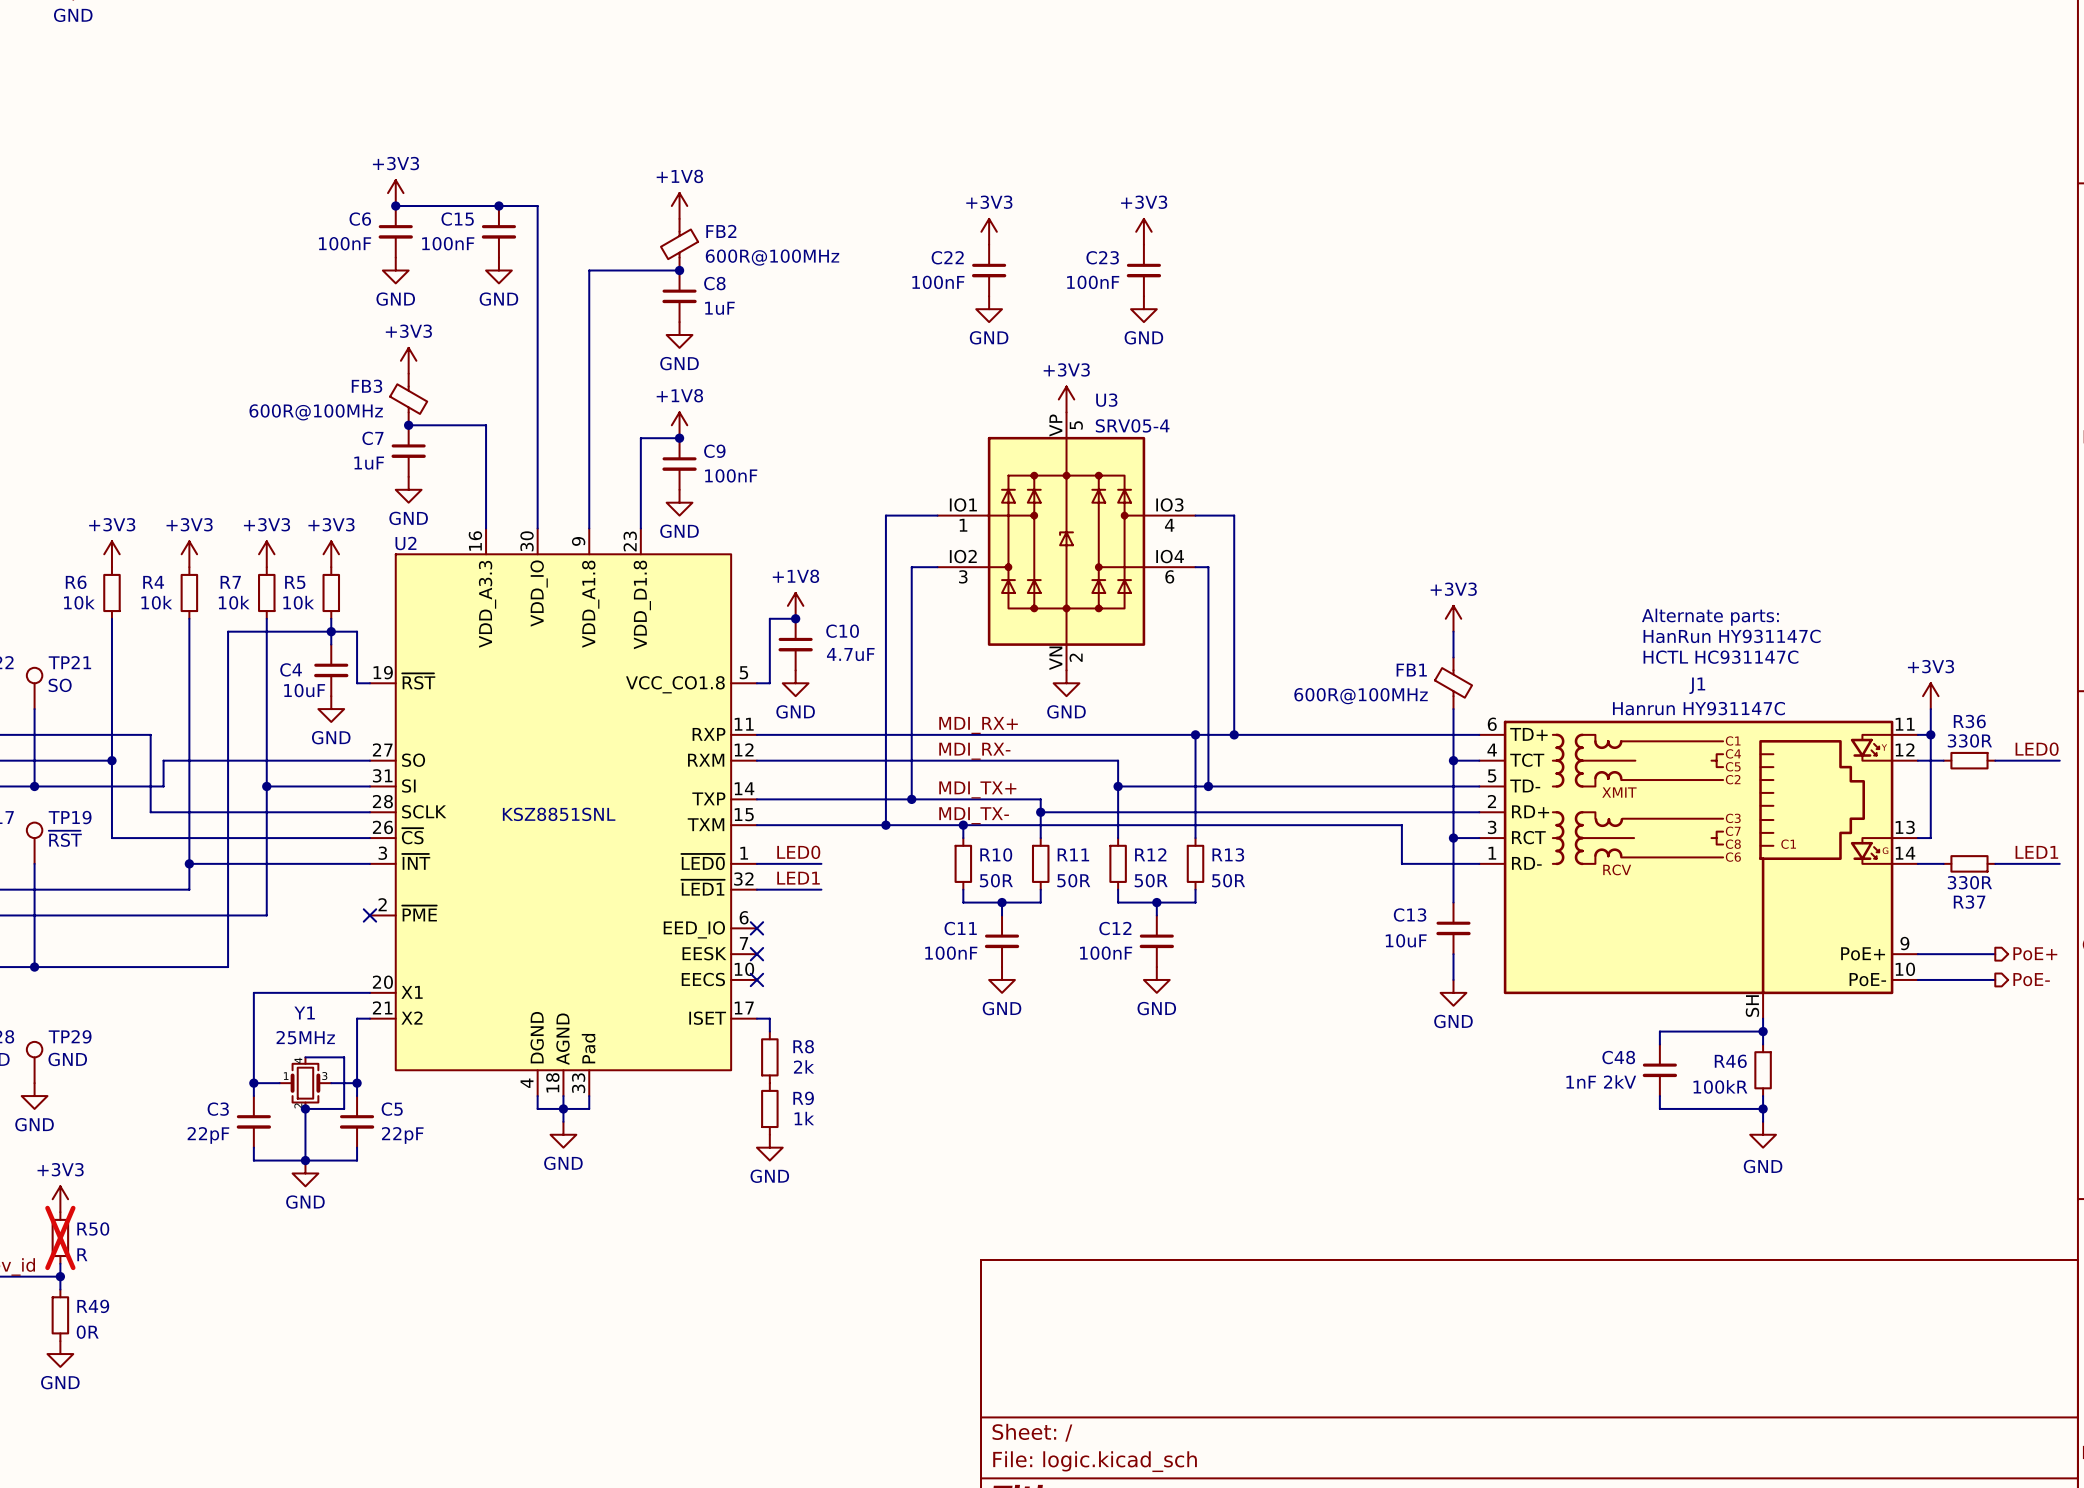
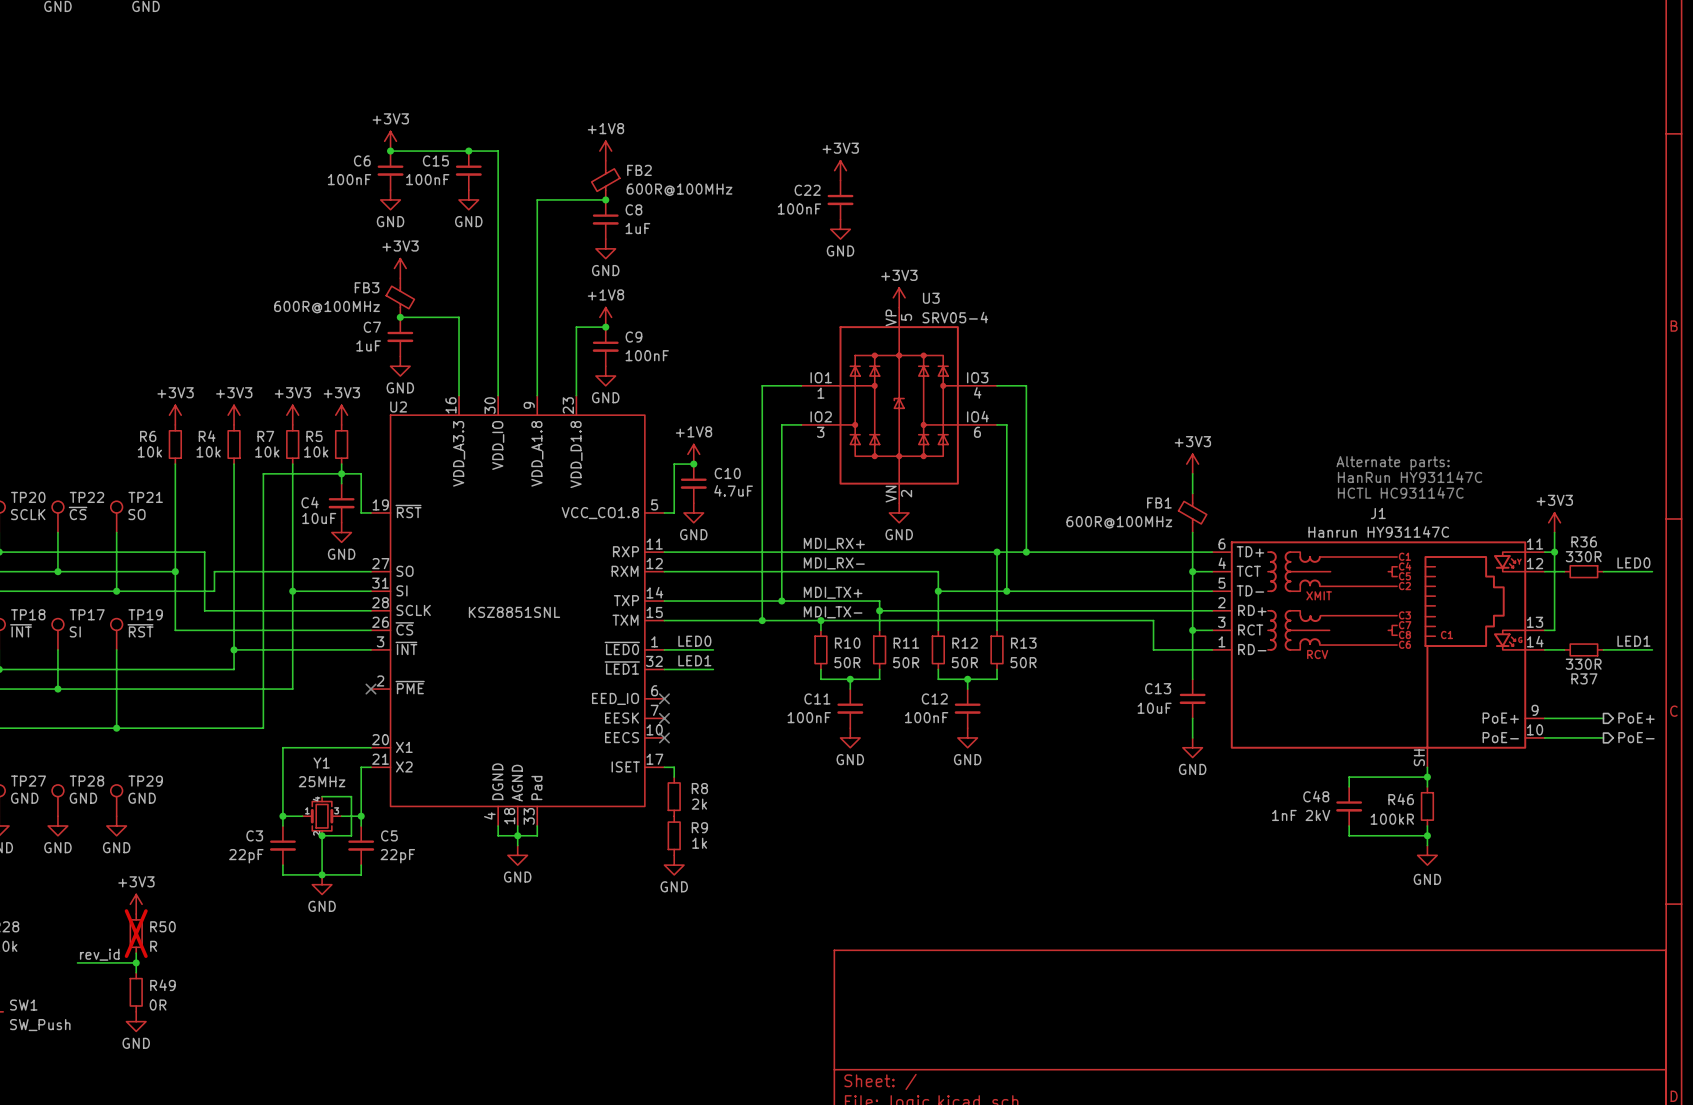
power symbol: +3V3 (1143, 231) -> none
C23: 100nF (1143, 270) -> none
power symbol: GND (1143, 309) -> none

